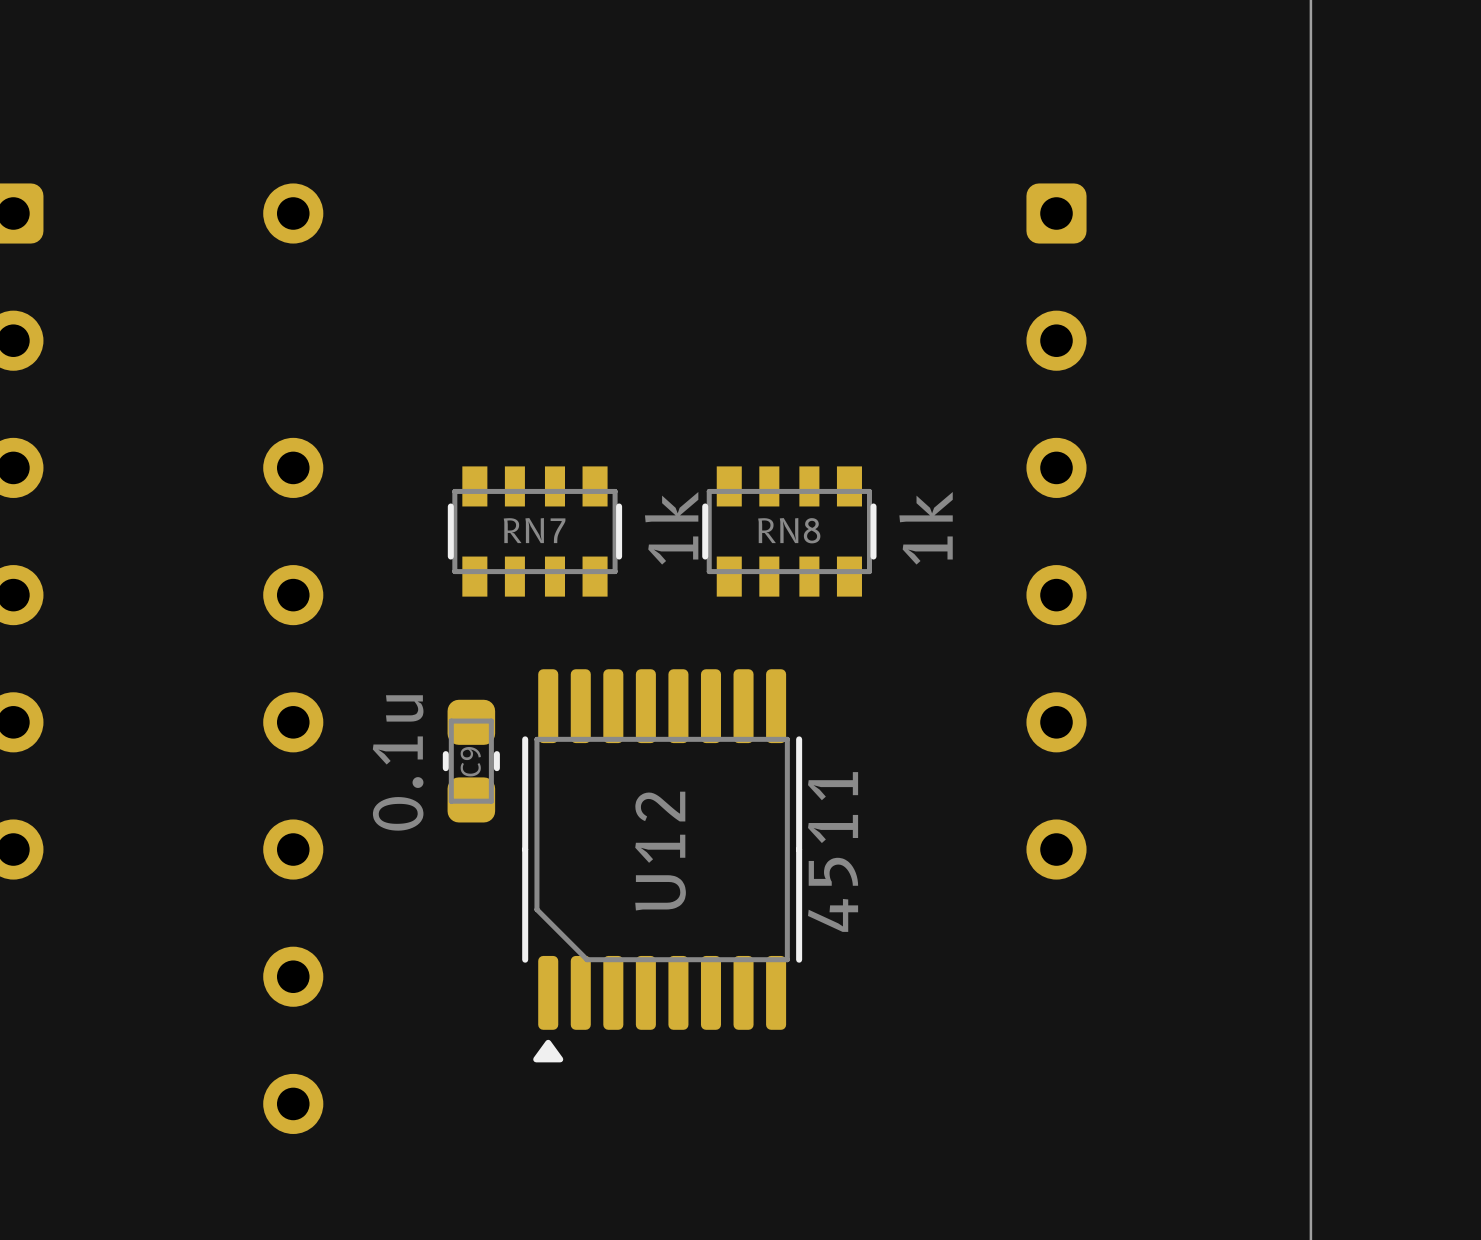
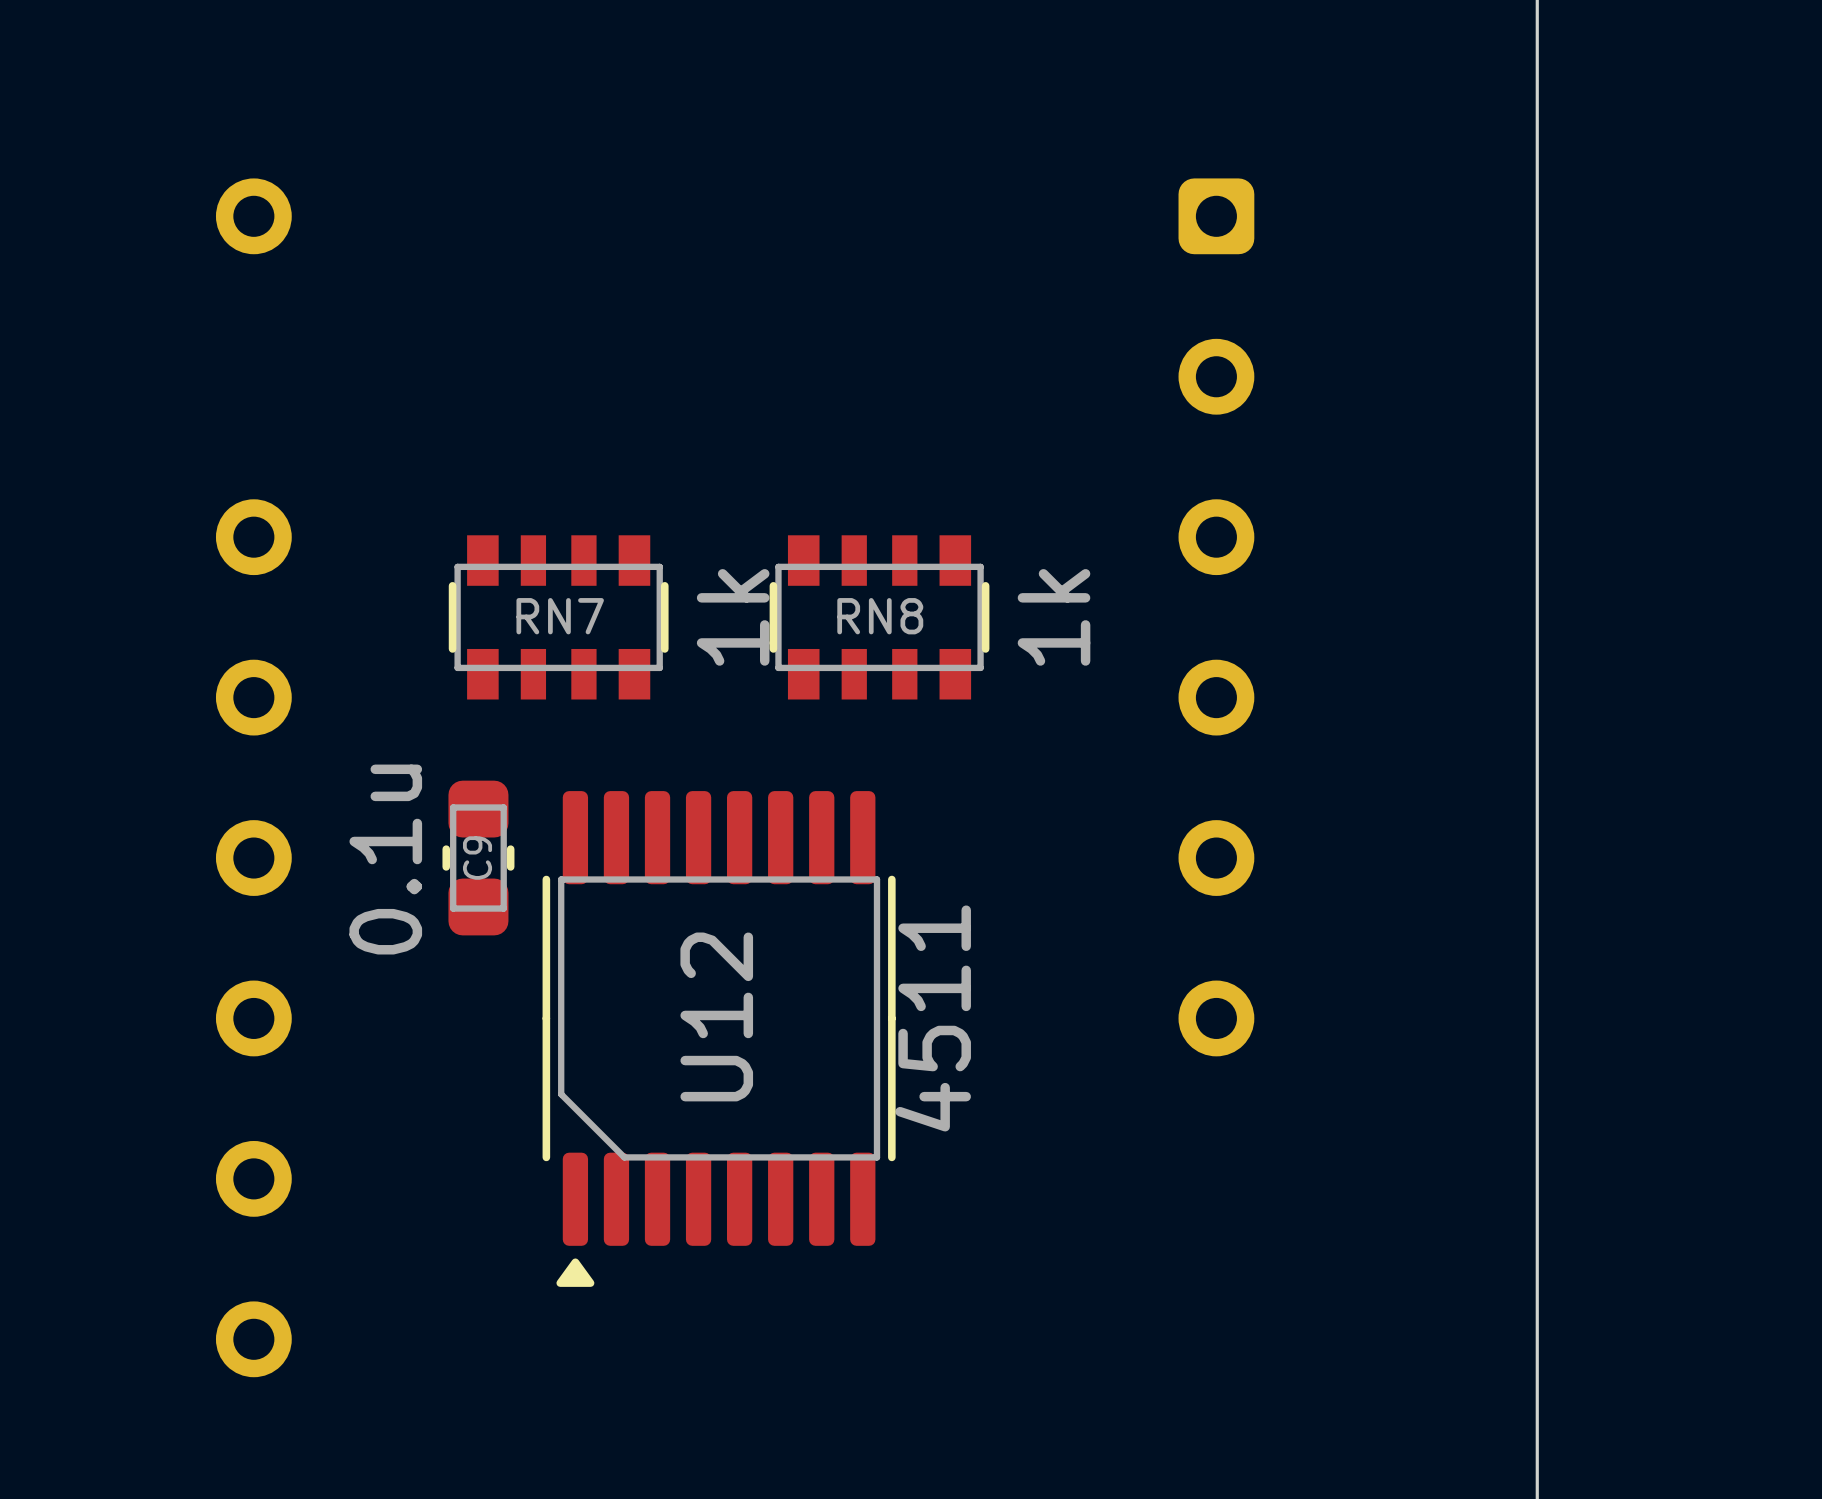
C9 position: (471, 761) -> (478, 858)

